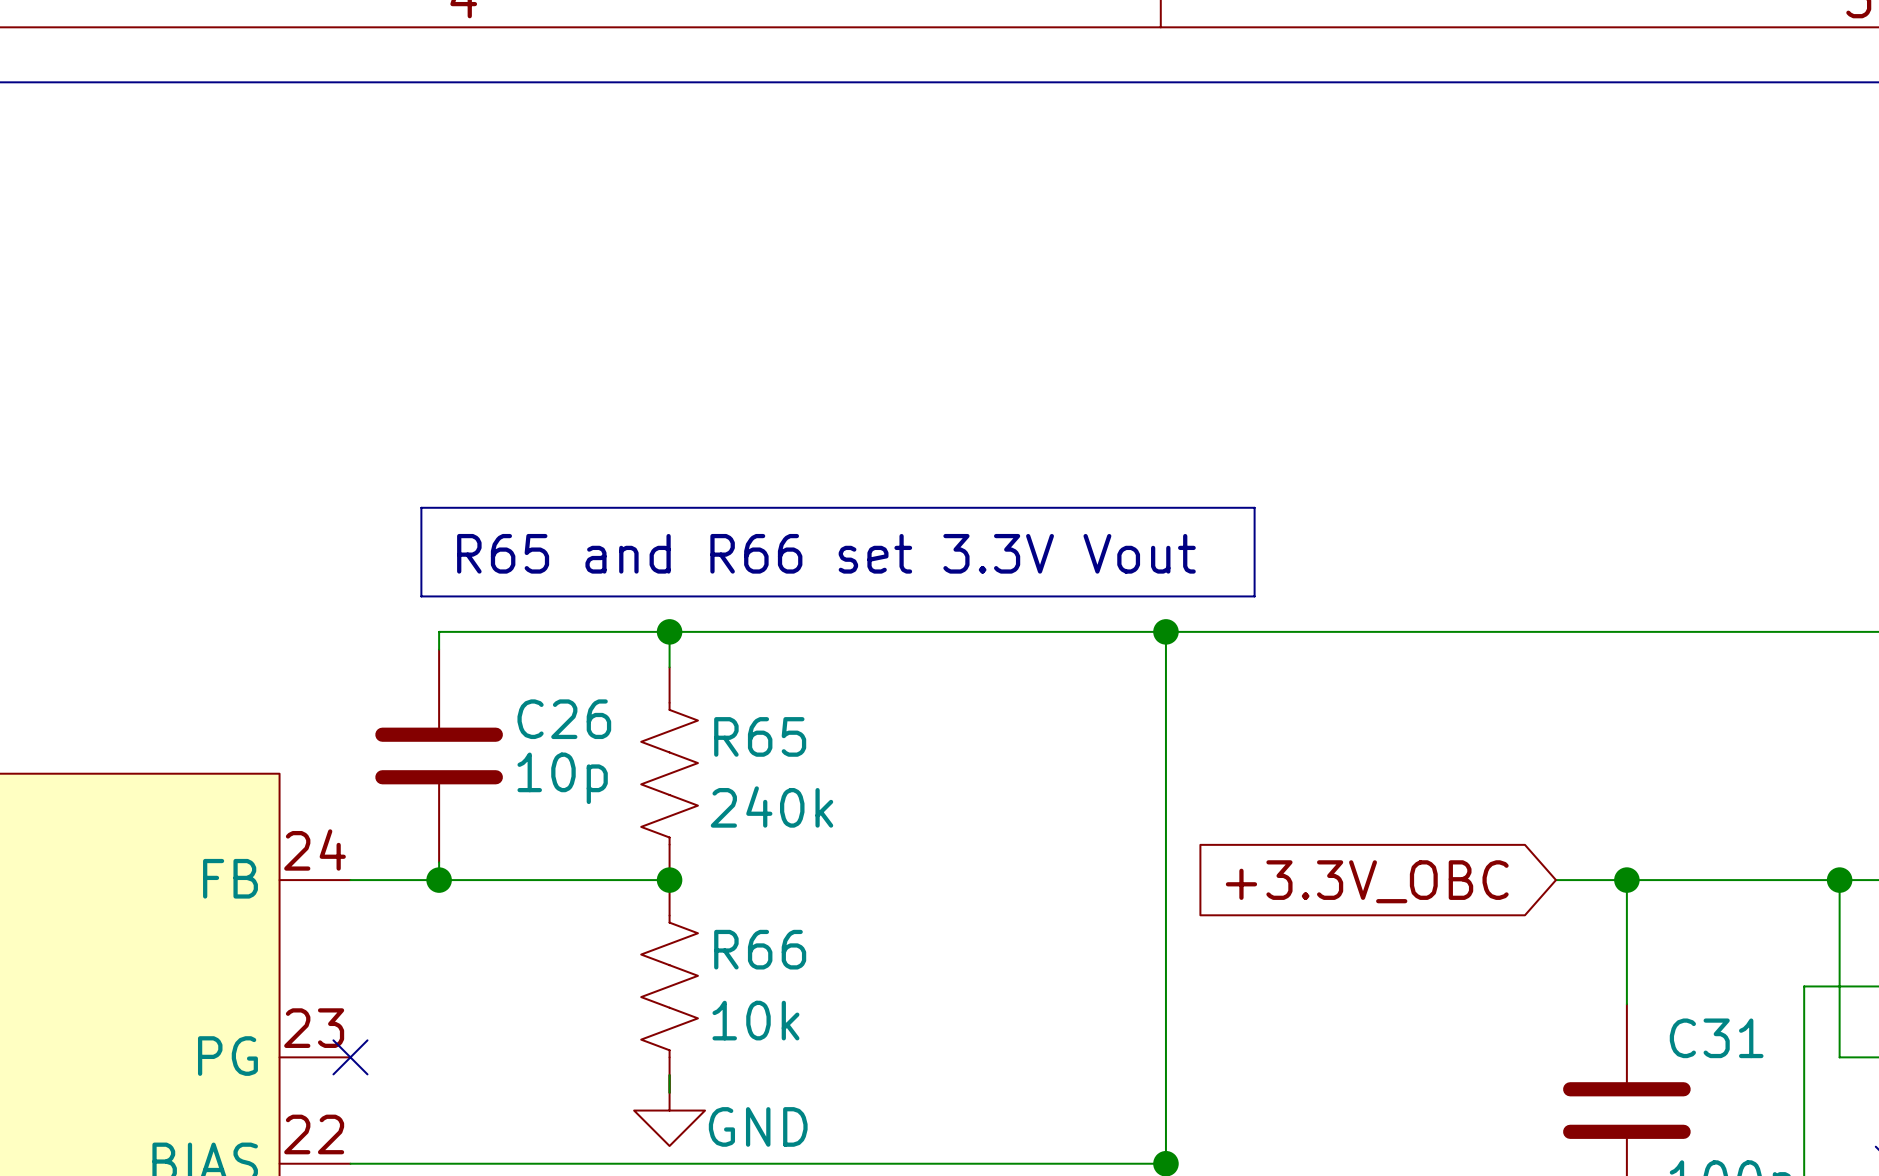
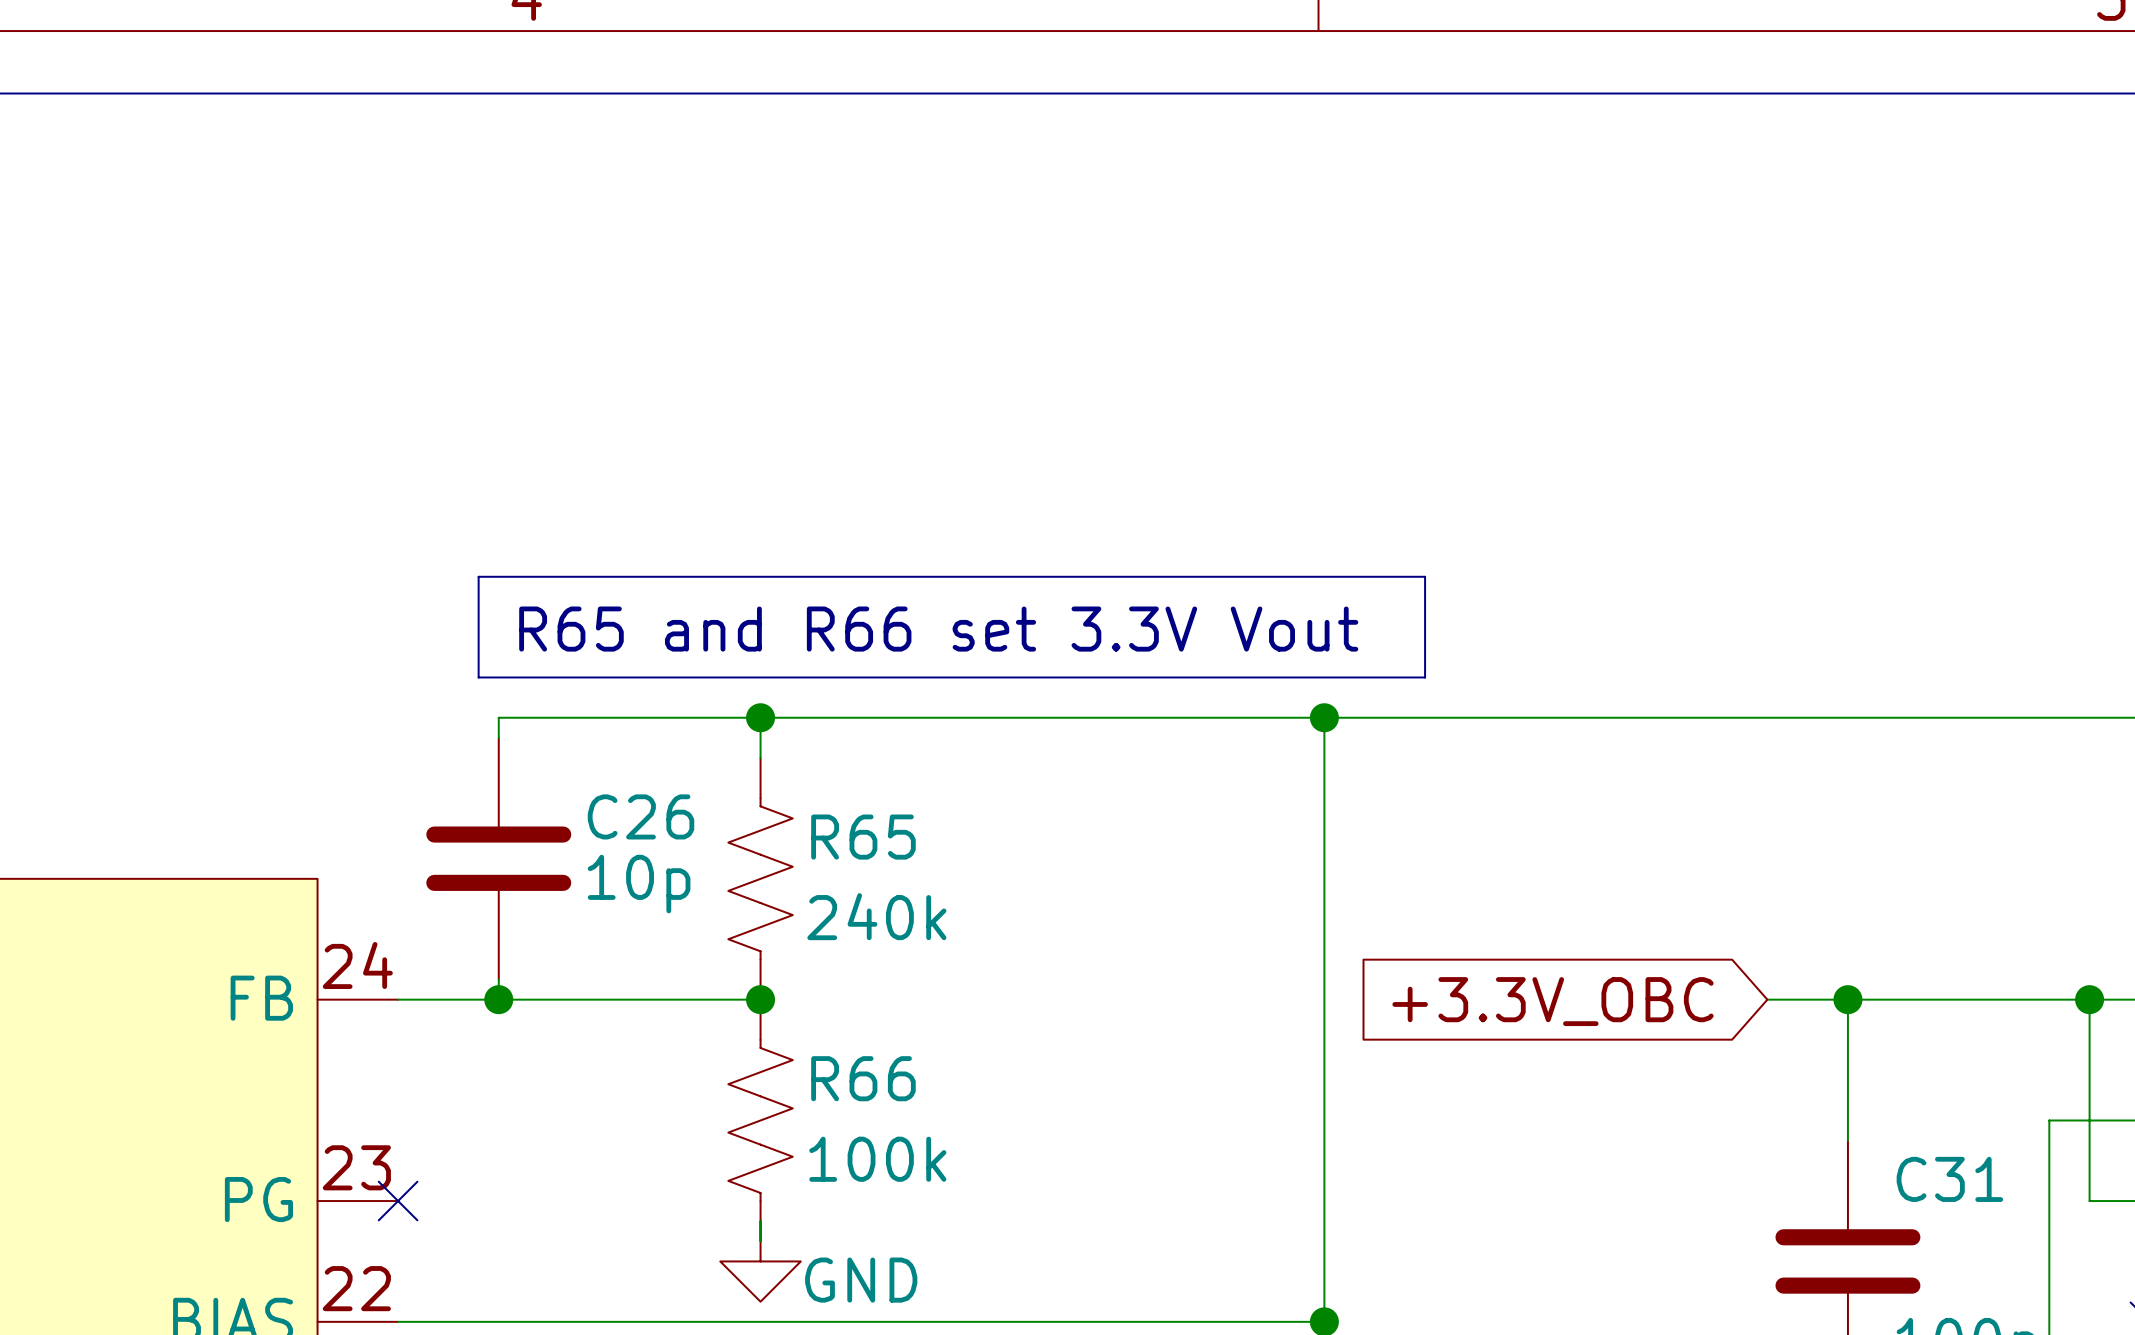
R66 value: 10k (755, 1020) -> 100k (877, 1159)

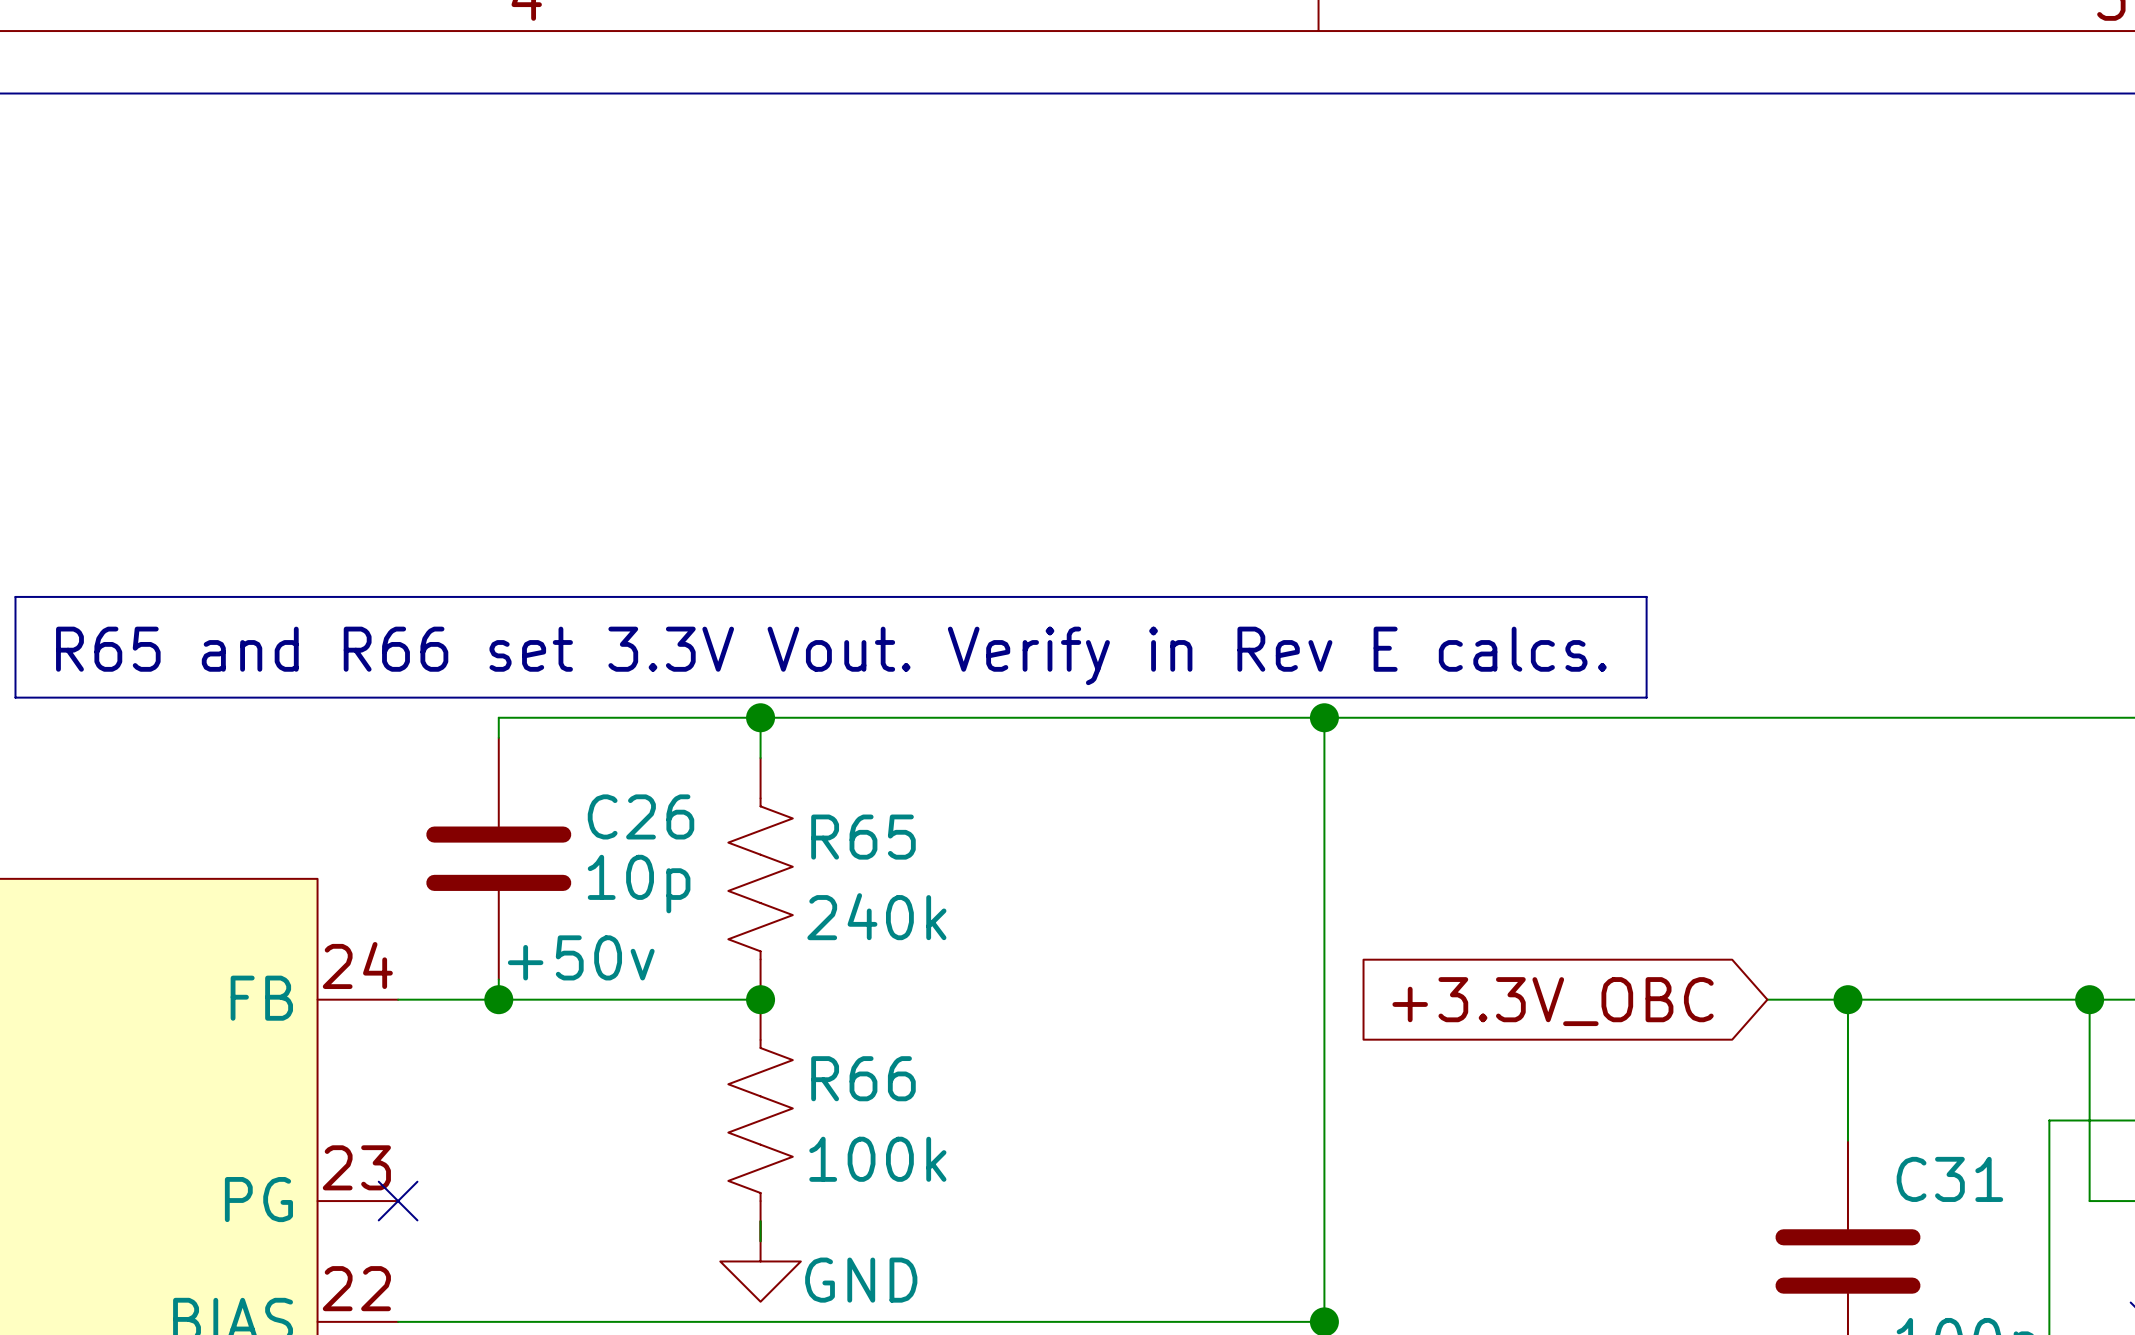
line: (478, 576) (1425, 576) (1425, 677) (478, 677) (478, 576) -> none
line: none -> (15, 596) (1646, 596) (1646, 697) (15, 697) (15, 596)
text: R65 and R66 set 3.3V Vout (938, 629) -> R65 and R66 set 3.3V Vout. Verify in Rev E calcs. (831, 655)
C26 text: none -> +50v (581, 957)

